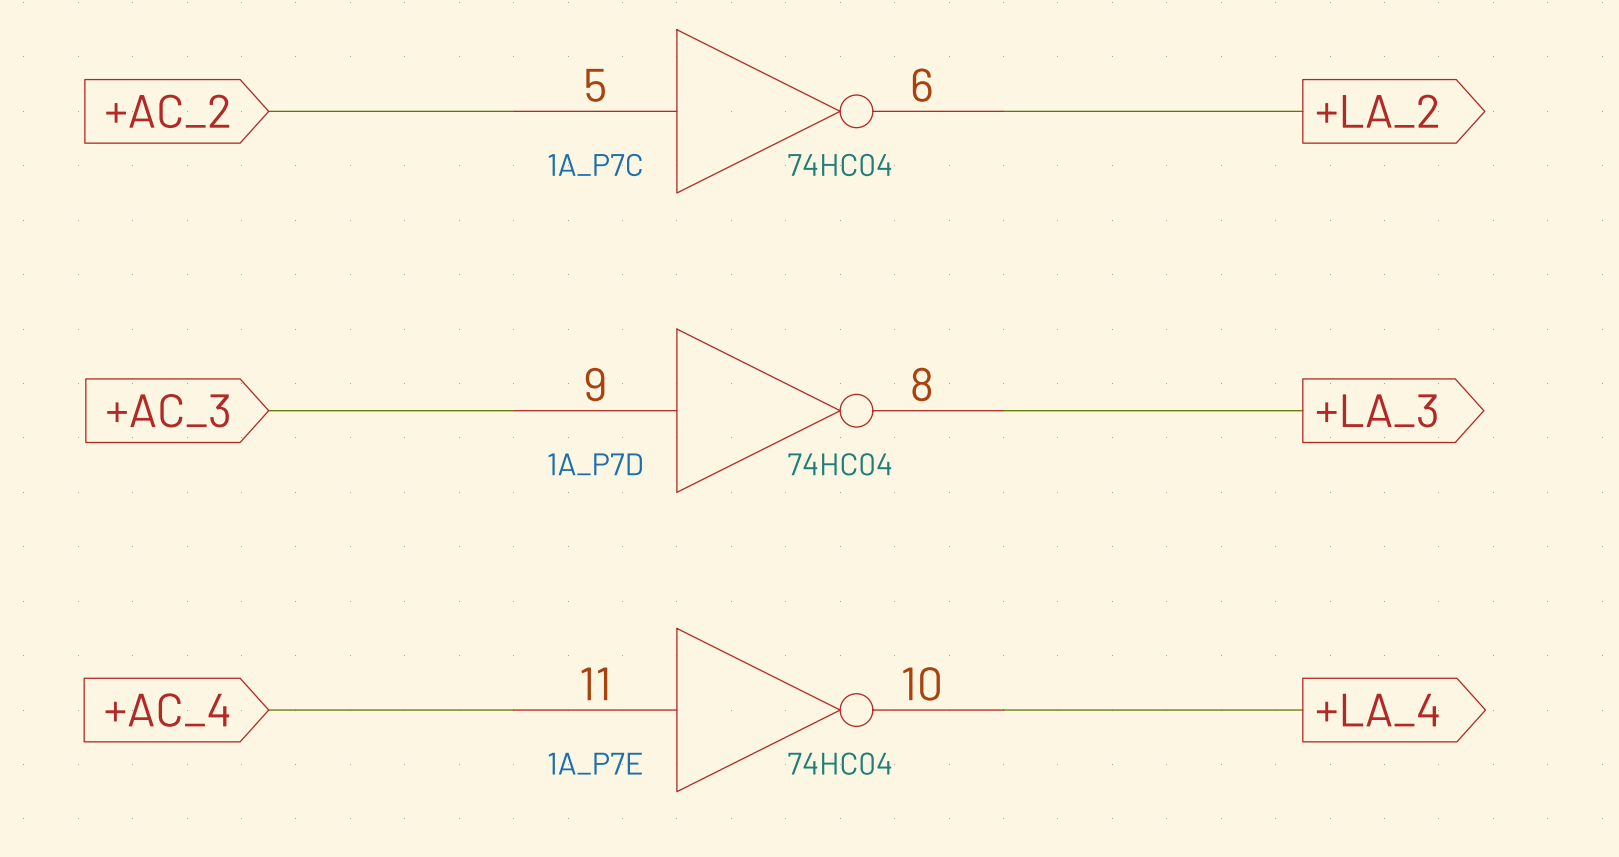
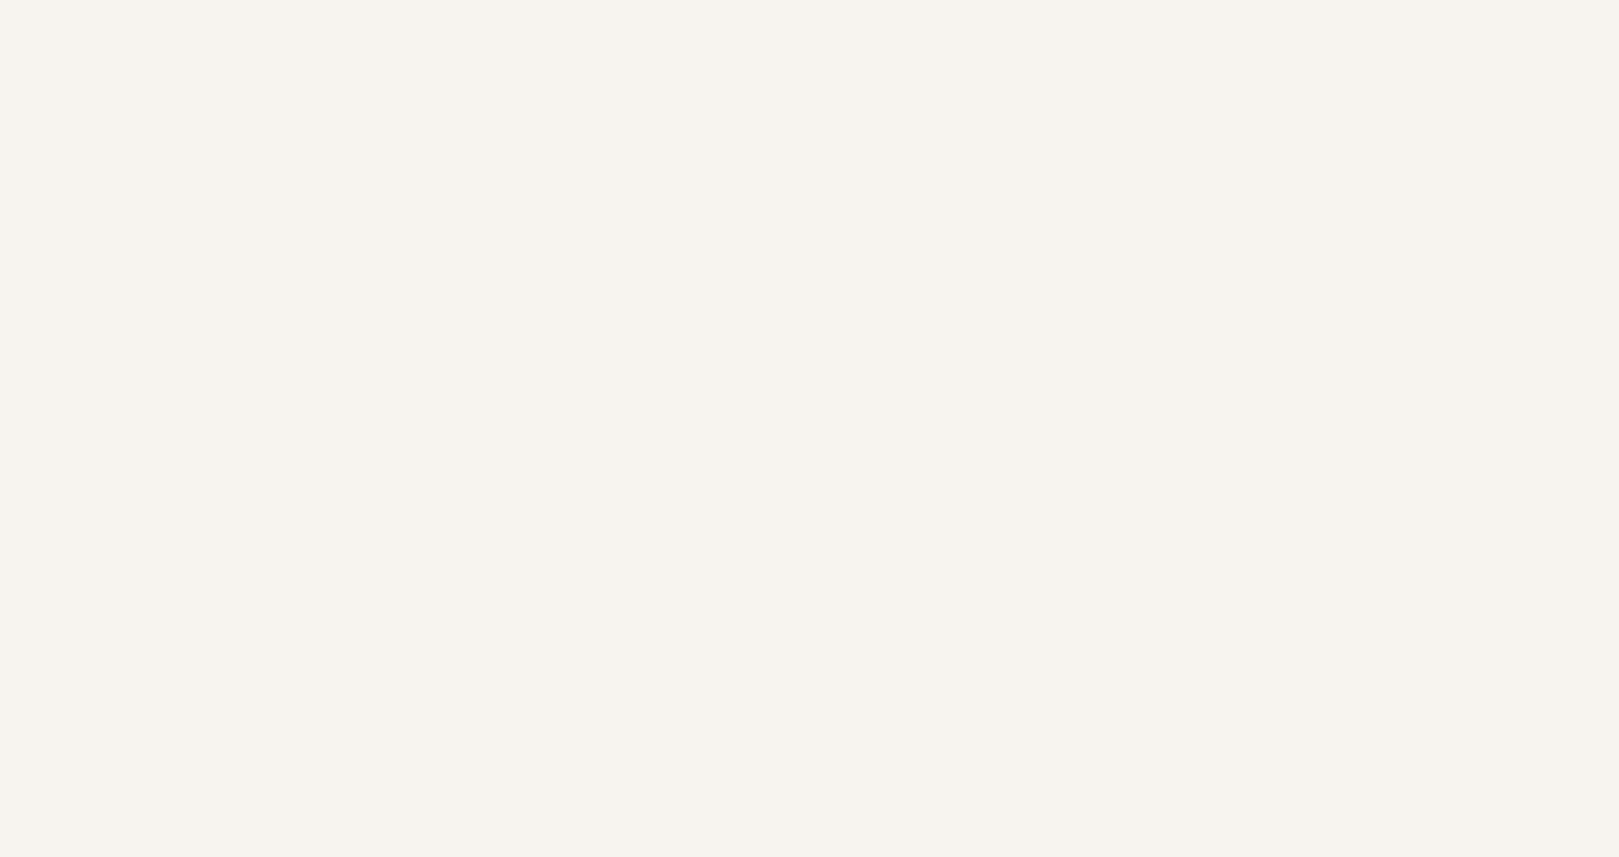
global label: +AC_2 (167, 111) -> none
wire: (268, 111) (513, 111) -> none
1A_P7C: 74HC04 (758, 111) -> none
wire: (1003, 111) (1302, 111) -> none
global label: +LA_2 (1377, 111) -> none
global label: +AC_3 (168, 410) -> none
wire: (268, 410) (513, 410) -> none
1A_P7D: 74HC04 (758, 410) -> none
wire: (1003, 410) (1302, 410) -> none
global label: +LA_3 (1376, 410) -> none
global label: +AC_4 (167, 710) -> none
wire: (268, 710) (513, 710) -> none
1A_P7E: 74HC04 (758, 710) -> none
wire: (1003, 710) (1302, 710) -> none
global label: +LA_4 (1377, 710) -> none

